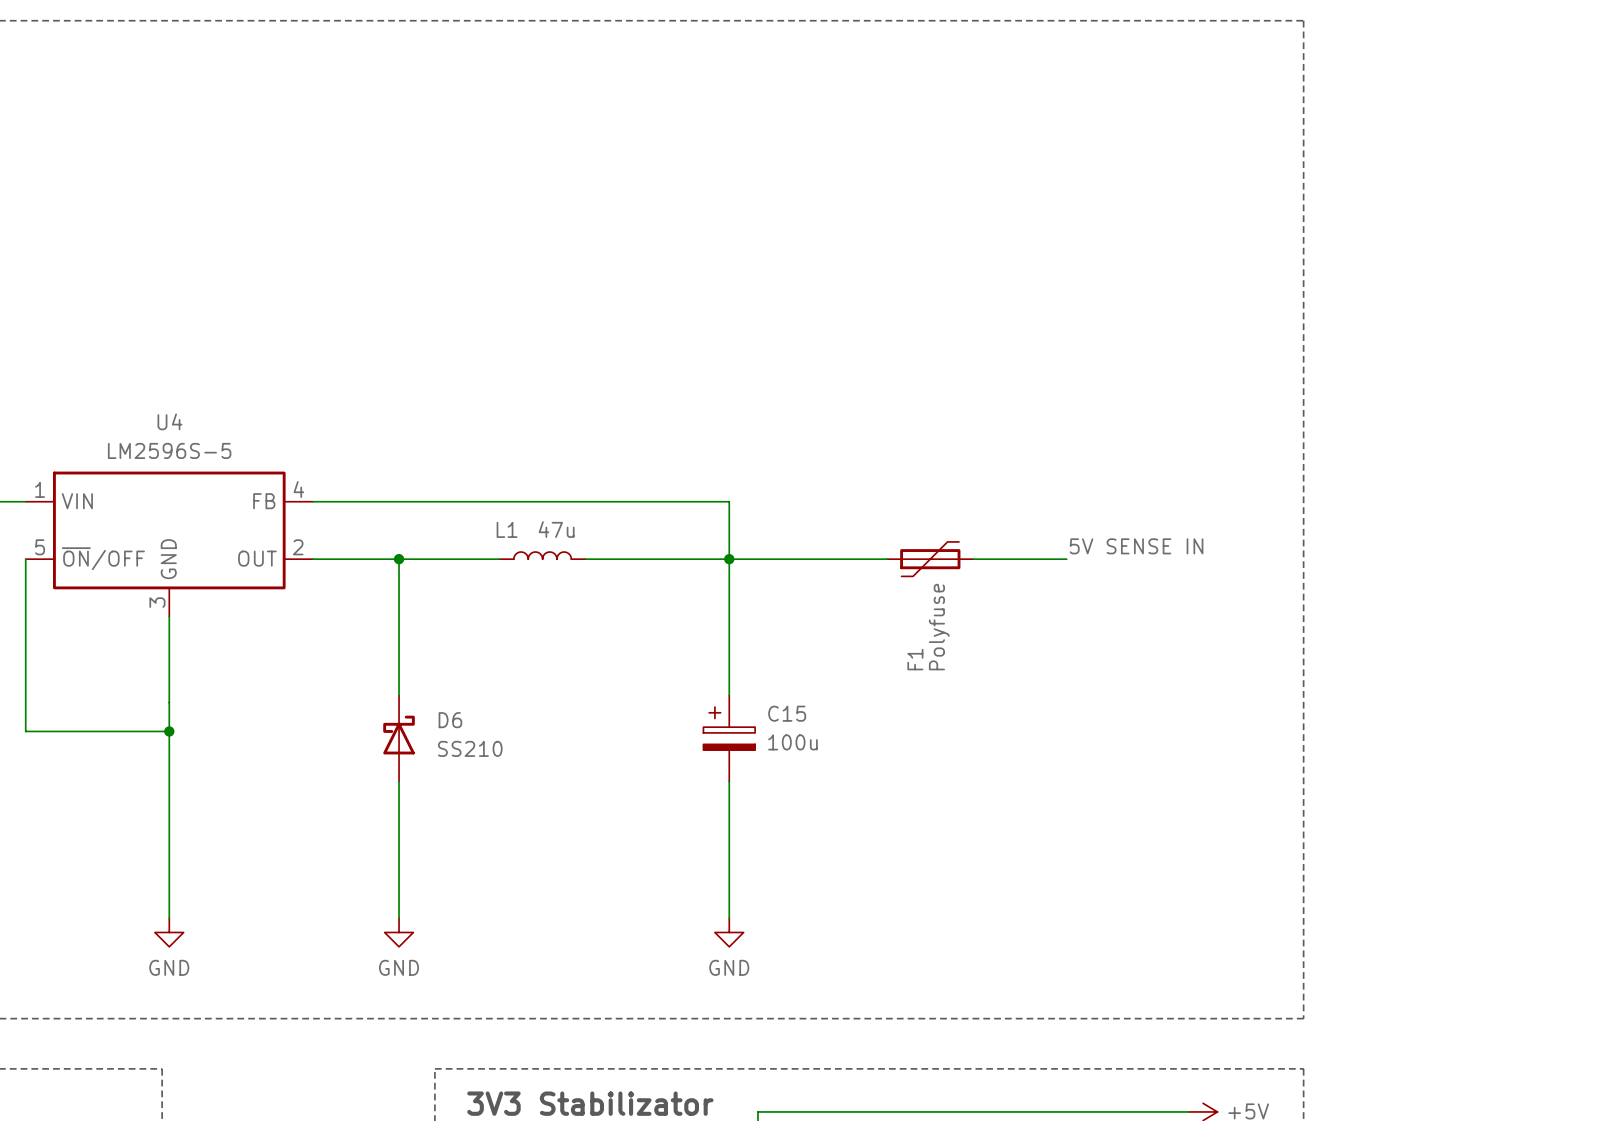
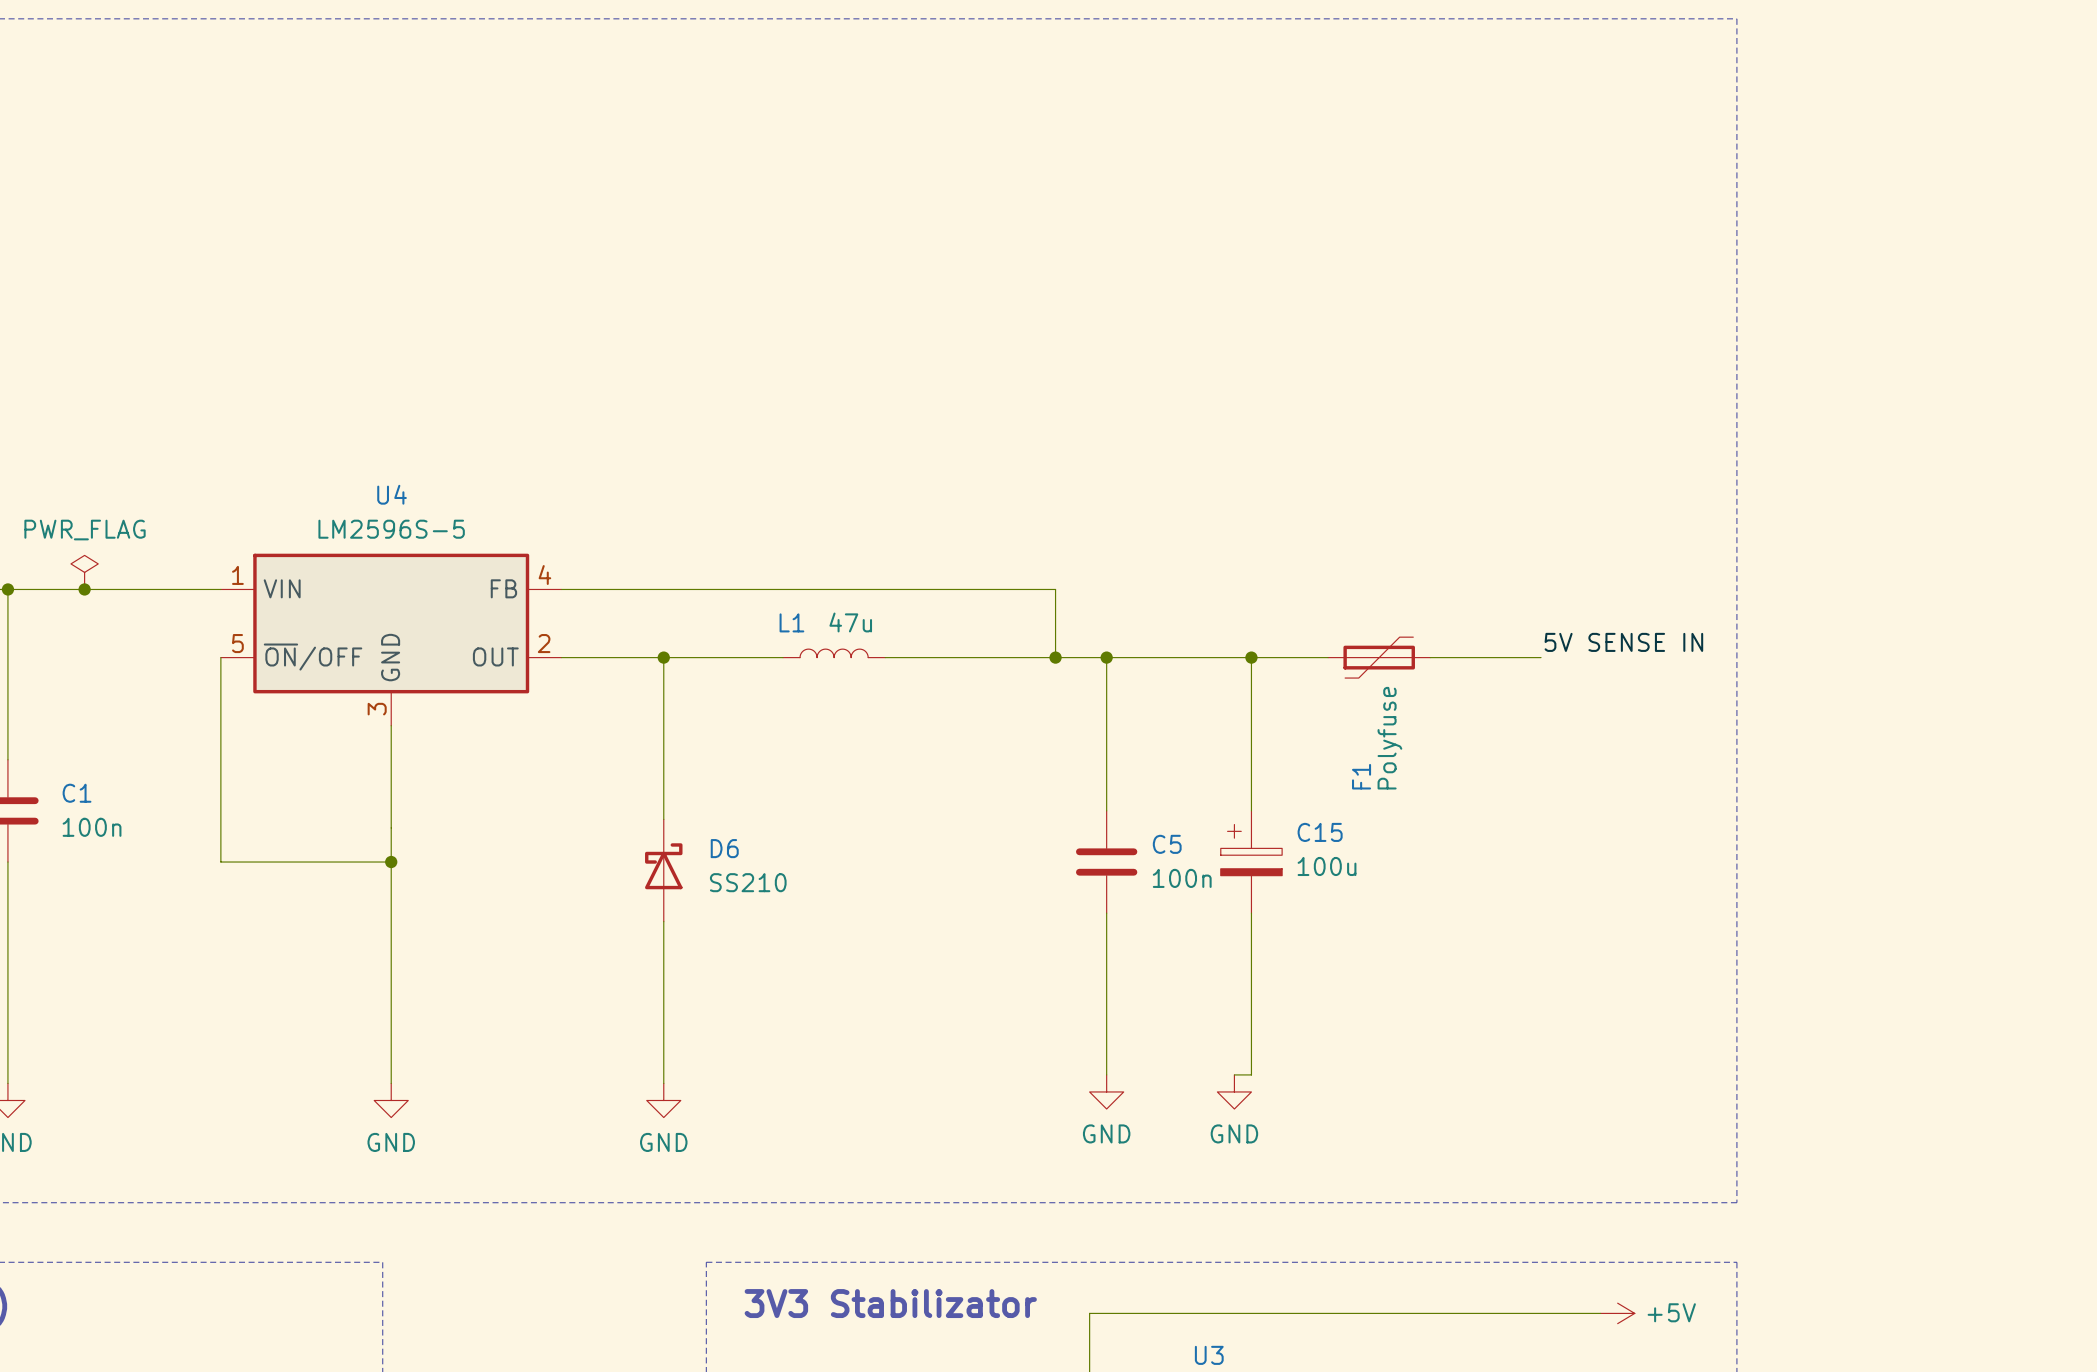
label position: 5V SENSE IN (1136, 546) -> 5V SENSE IN (1623, 642)
wire: (729, 559) (729, 695) -> none
wire: none -> (1106, 657) (1106, 810)
junction: none -> (1106, 657)
wire: none -> (1251, 657) (1251, 810)
junction: none -> (1251, 657)
F1 position: (930, 559) -> (1379, 657)
wire: none -> (1455, 657) (1541, 657)
C5: none -> 100n (1106, 862)
C15 position: (729, 738) -> (1251, 862)
wire: none -> (1251, 913) (1251, 1074) (1234, 1074)
wire: (729, 781) (729, 918) -> (1106, 913) (1106, 1074)
power symbol: none -> GND (1234, 1091)
power symbol position: GND (729, 932) -> GND (1106, 1091)

